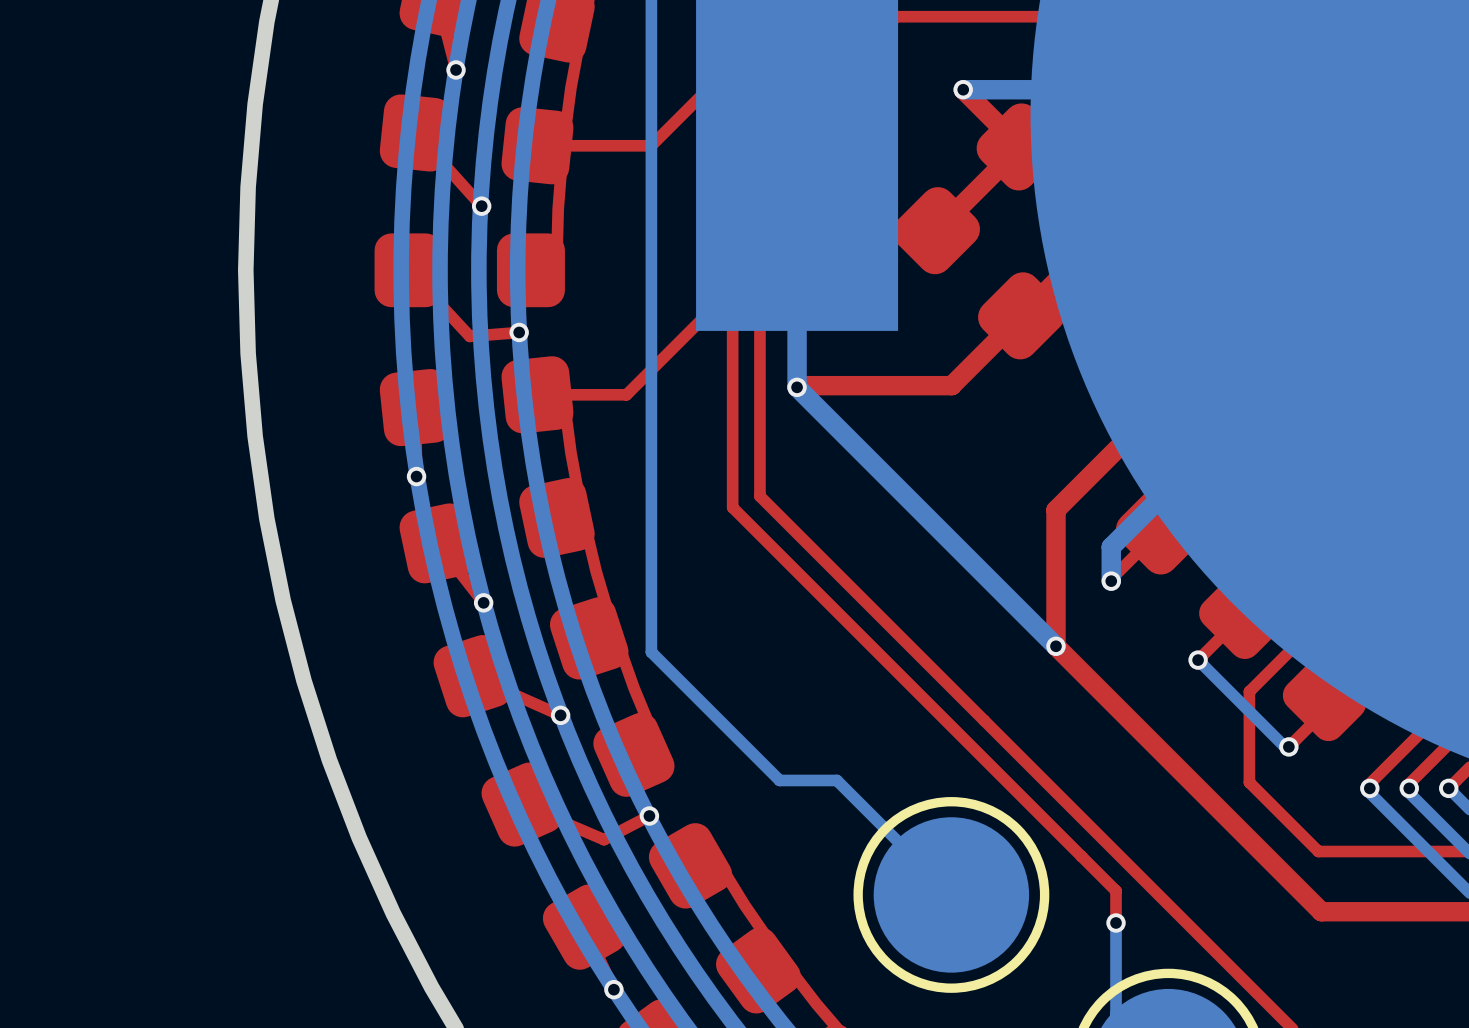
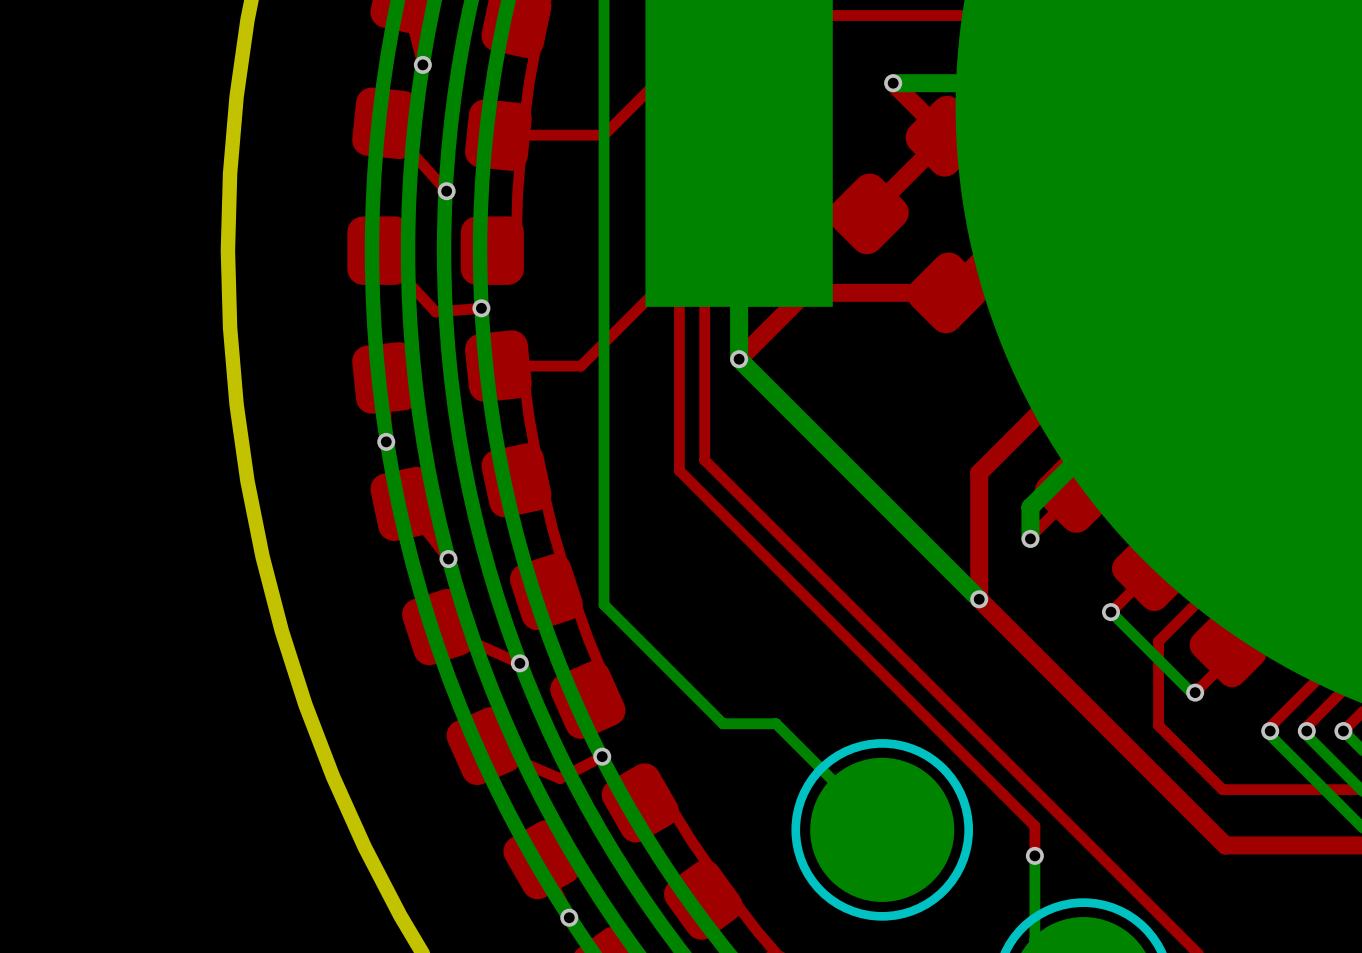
top track: (1021, 315) (951, 385) (798, 385) -> (947, 292) (805, 292) (740, 357)

